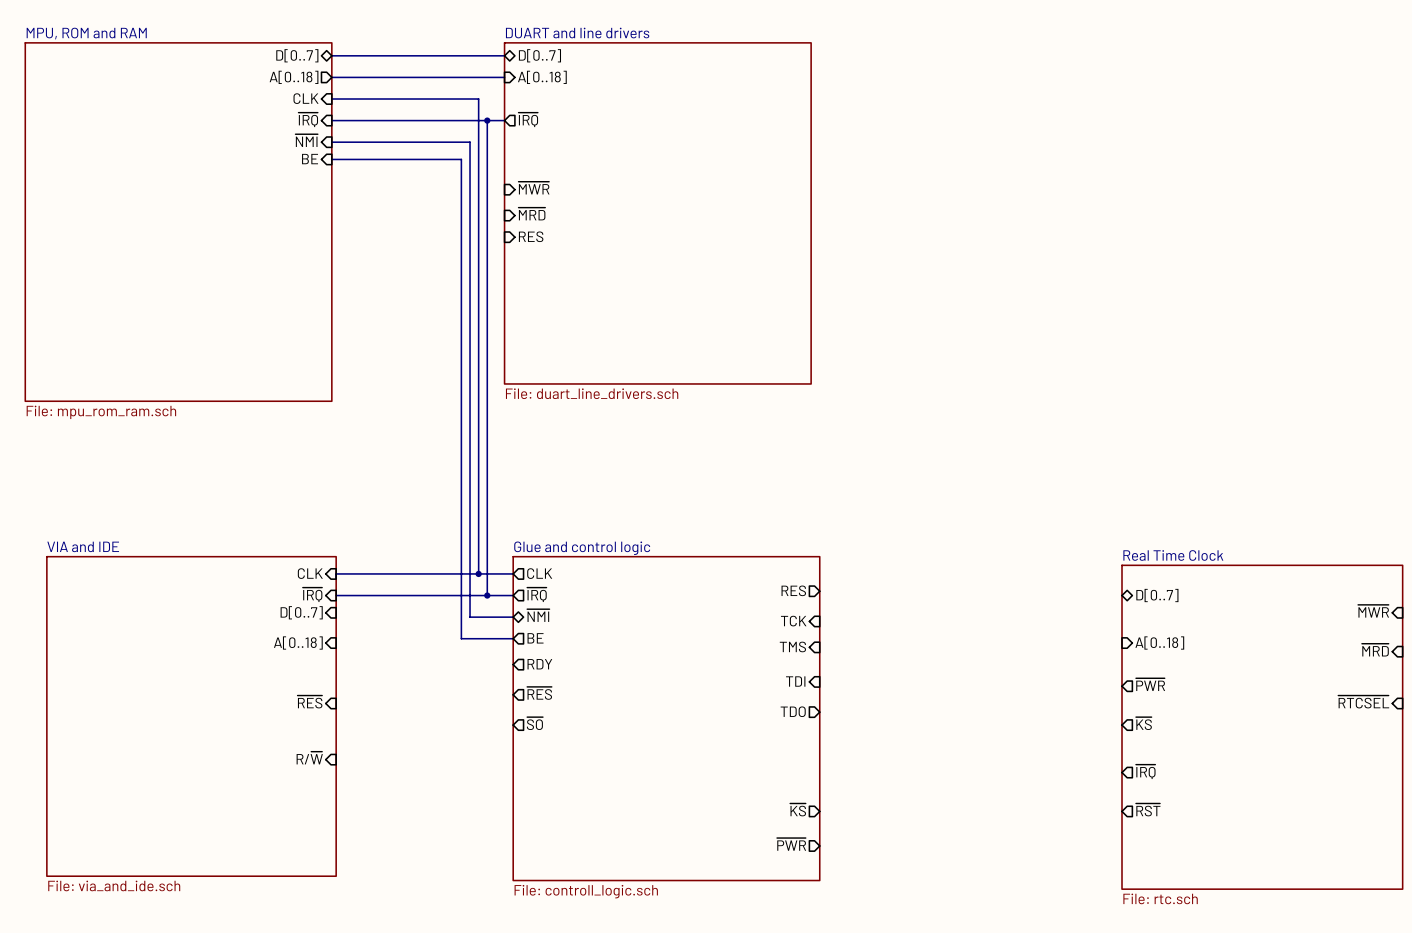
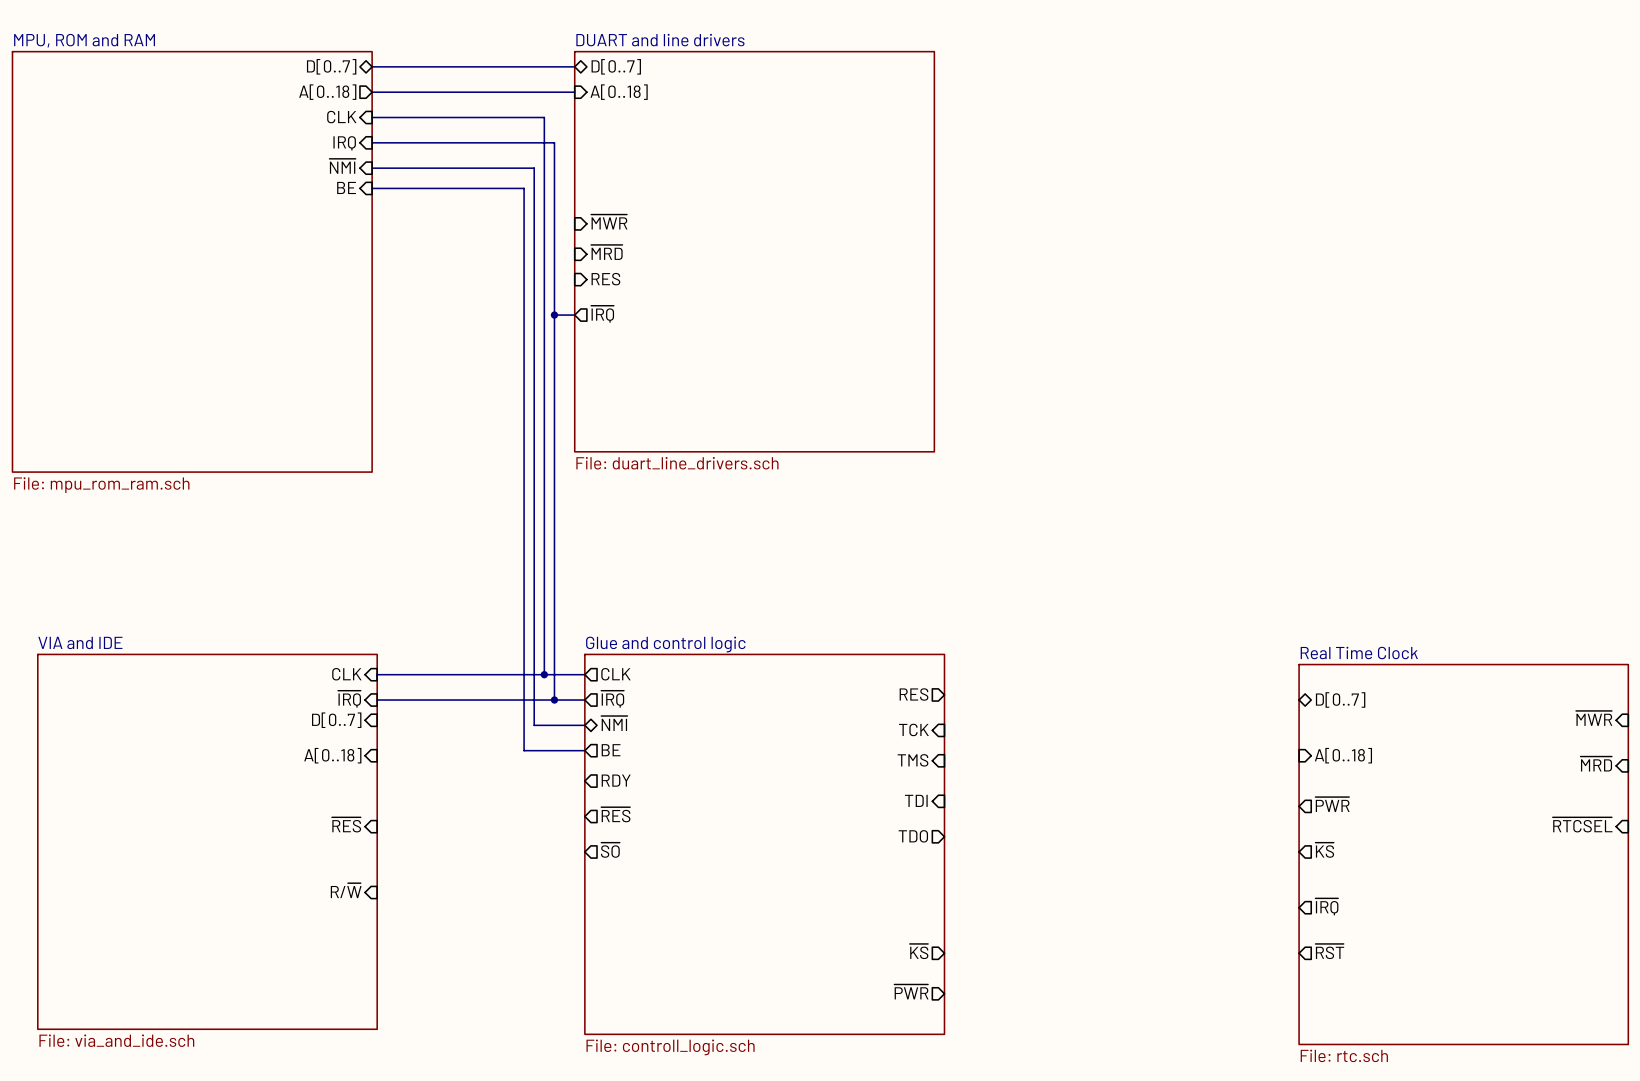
sheet pin: ~{IRQ} (308, 119) -> IRQ (344, 143)
sheet pin position: ~{IRQ} (528, 119) -> ~{IRQ} (602, 314)
wire: (487, 120) (504, 120) -> (554, 315) (574, 315)
junction: (487, 120) -> none
junction: none -> (554, 315)

